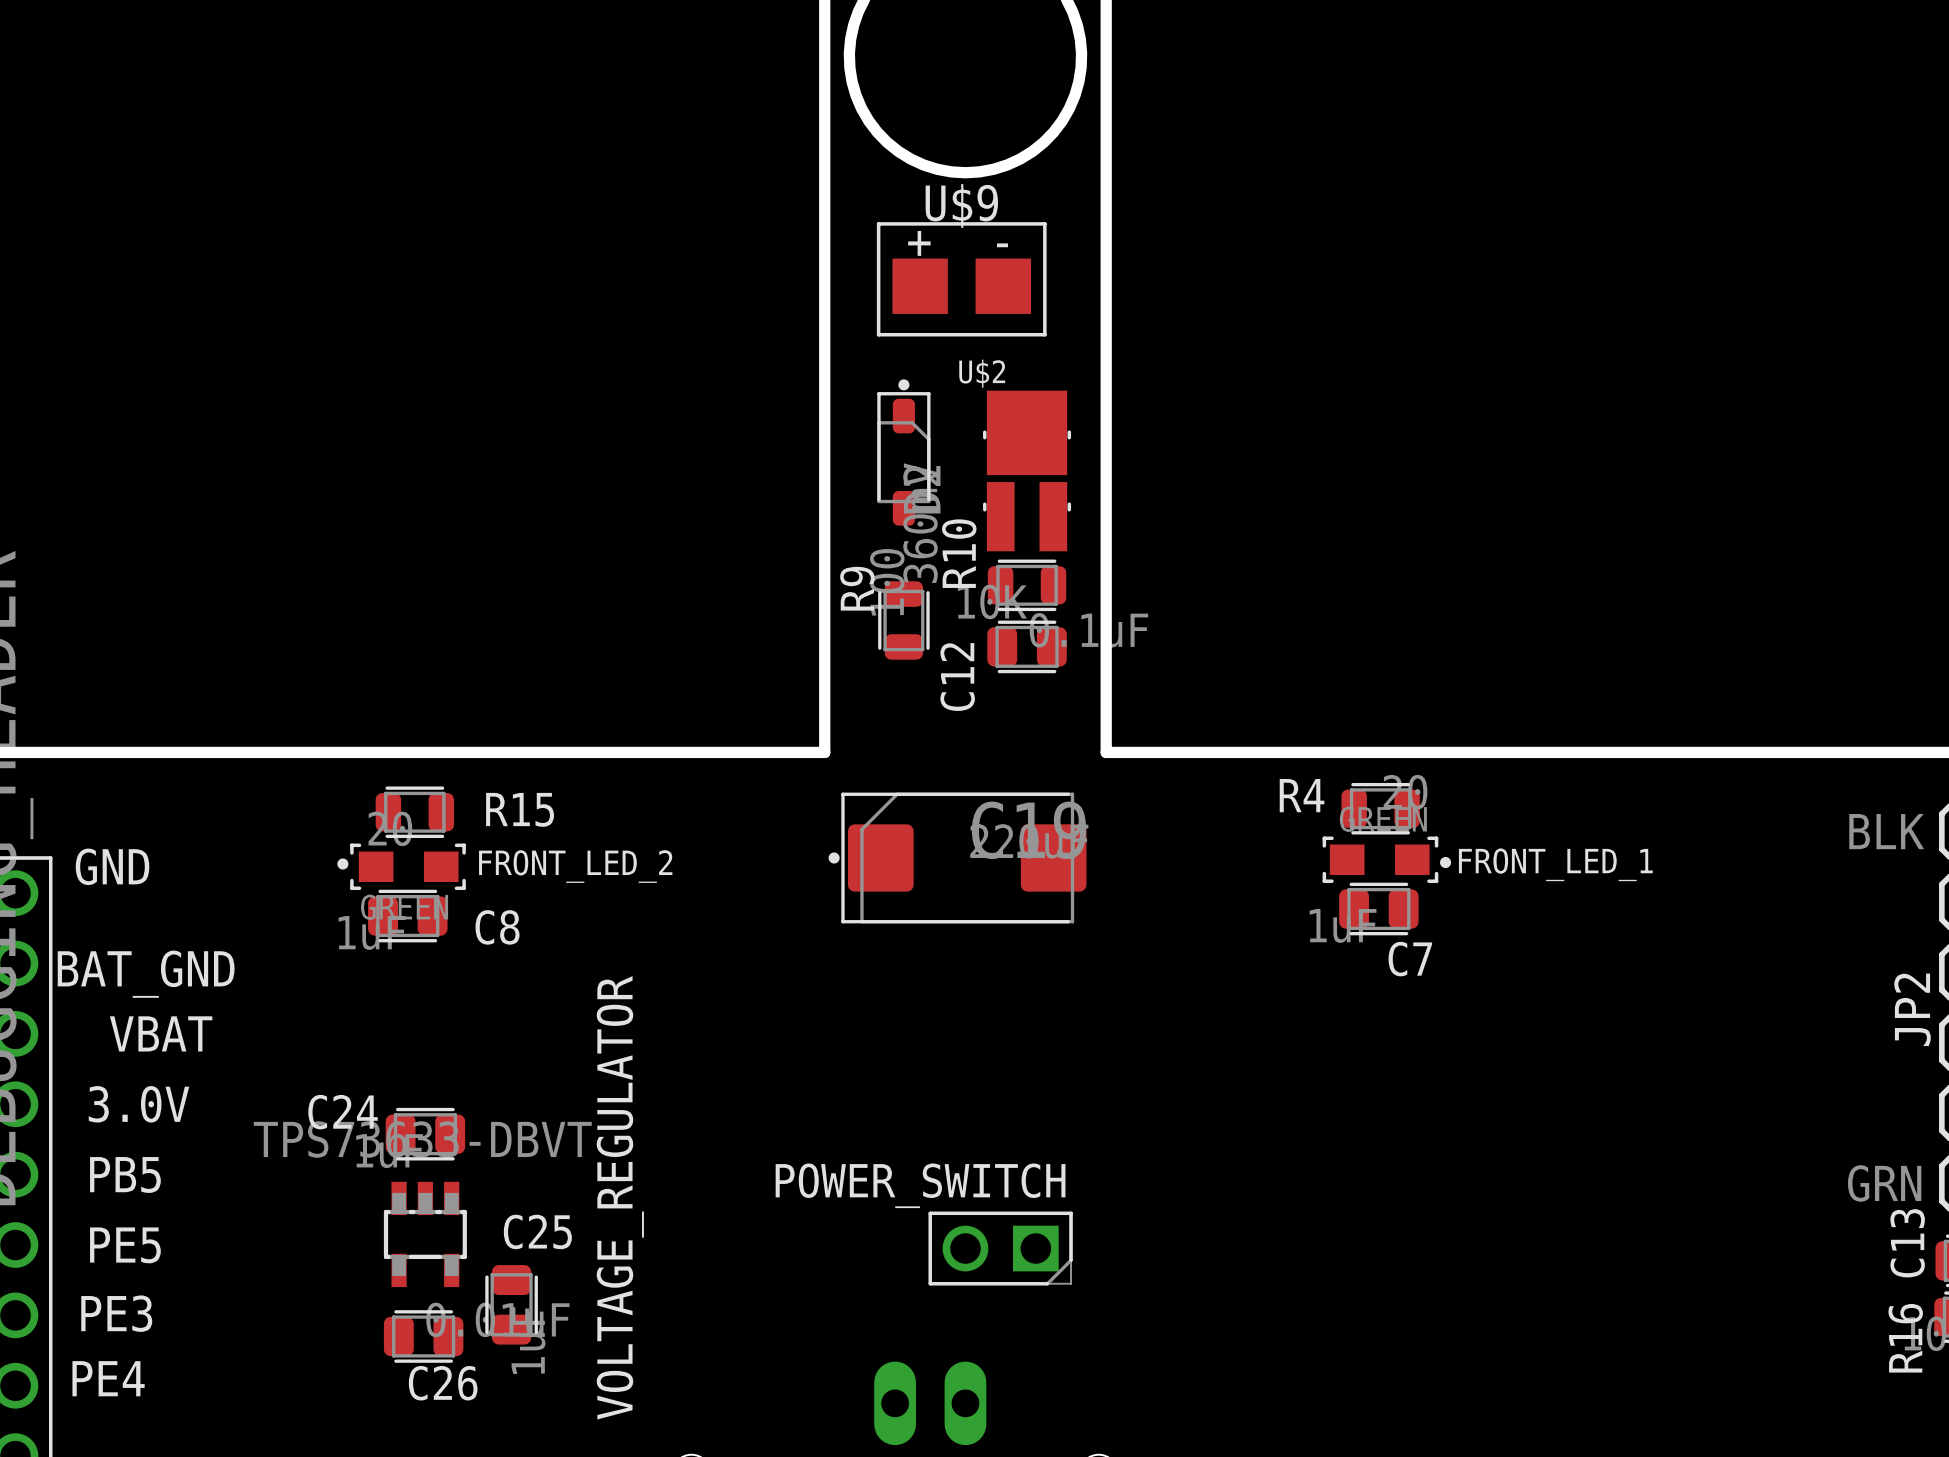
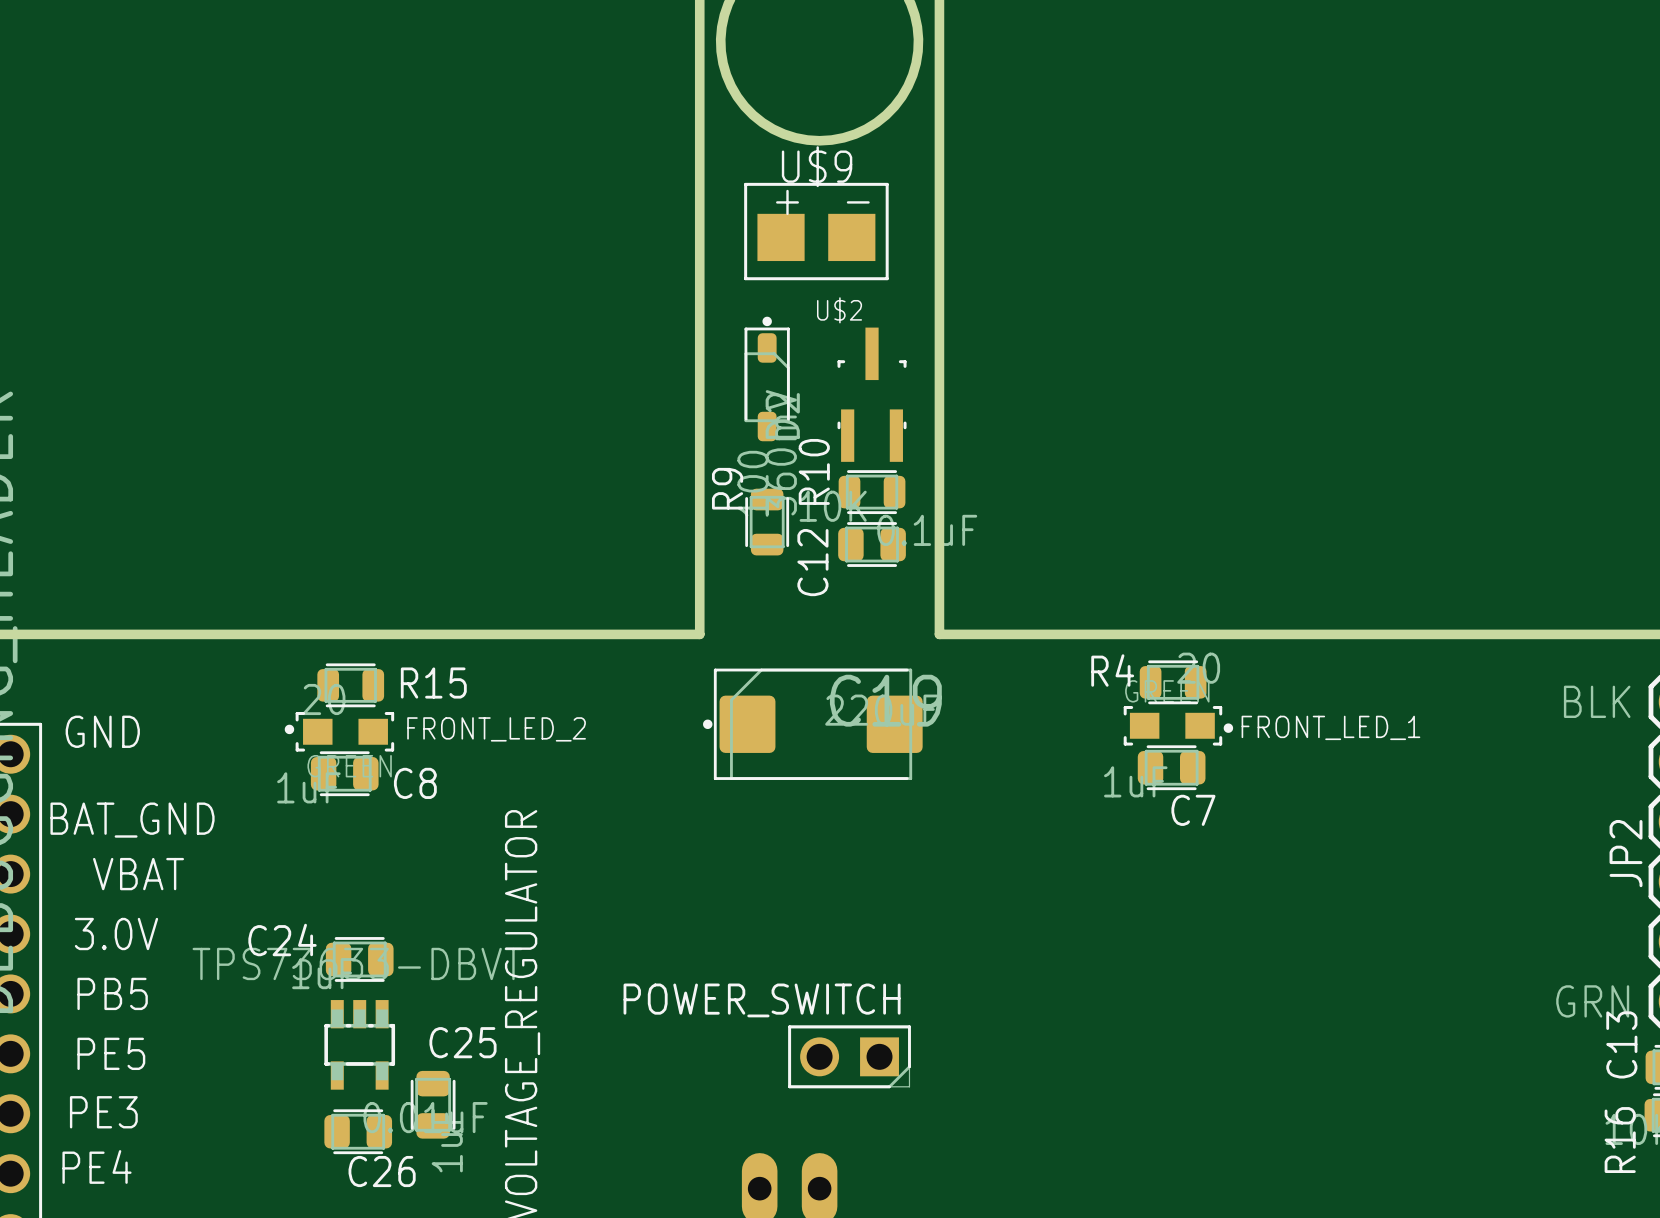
U$2 footprint: [983, 390, 1072, 552] -> [837, 327, 907, 462]

